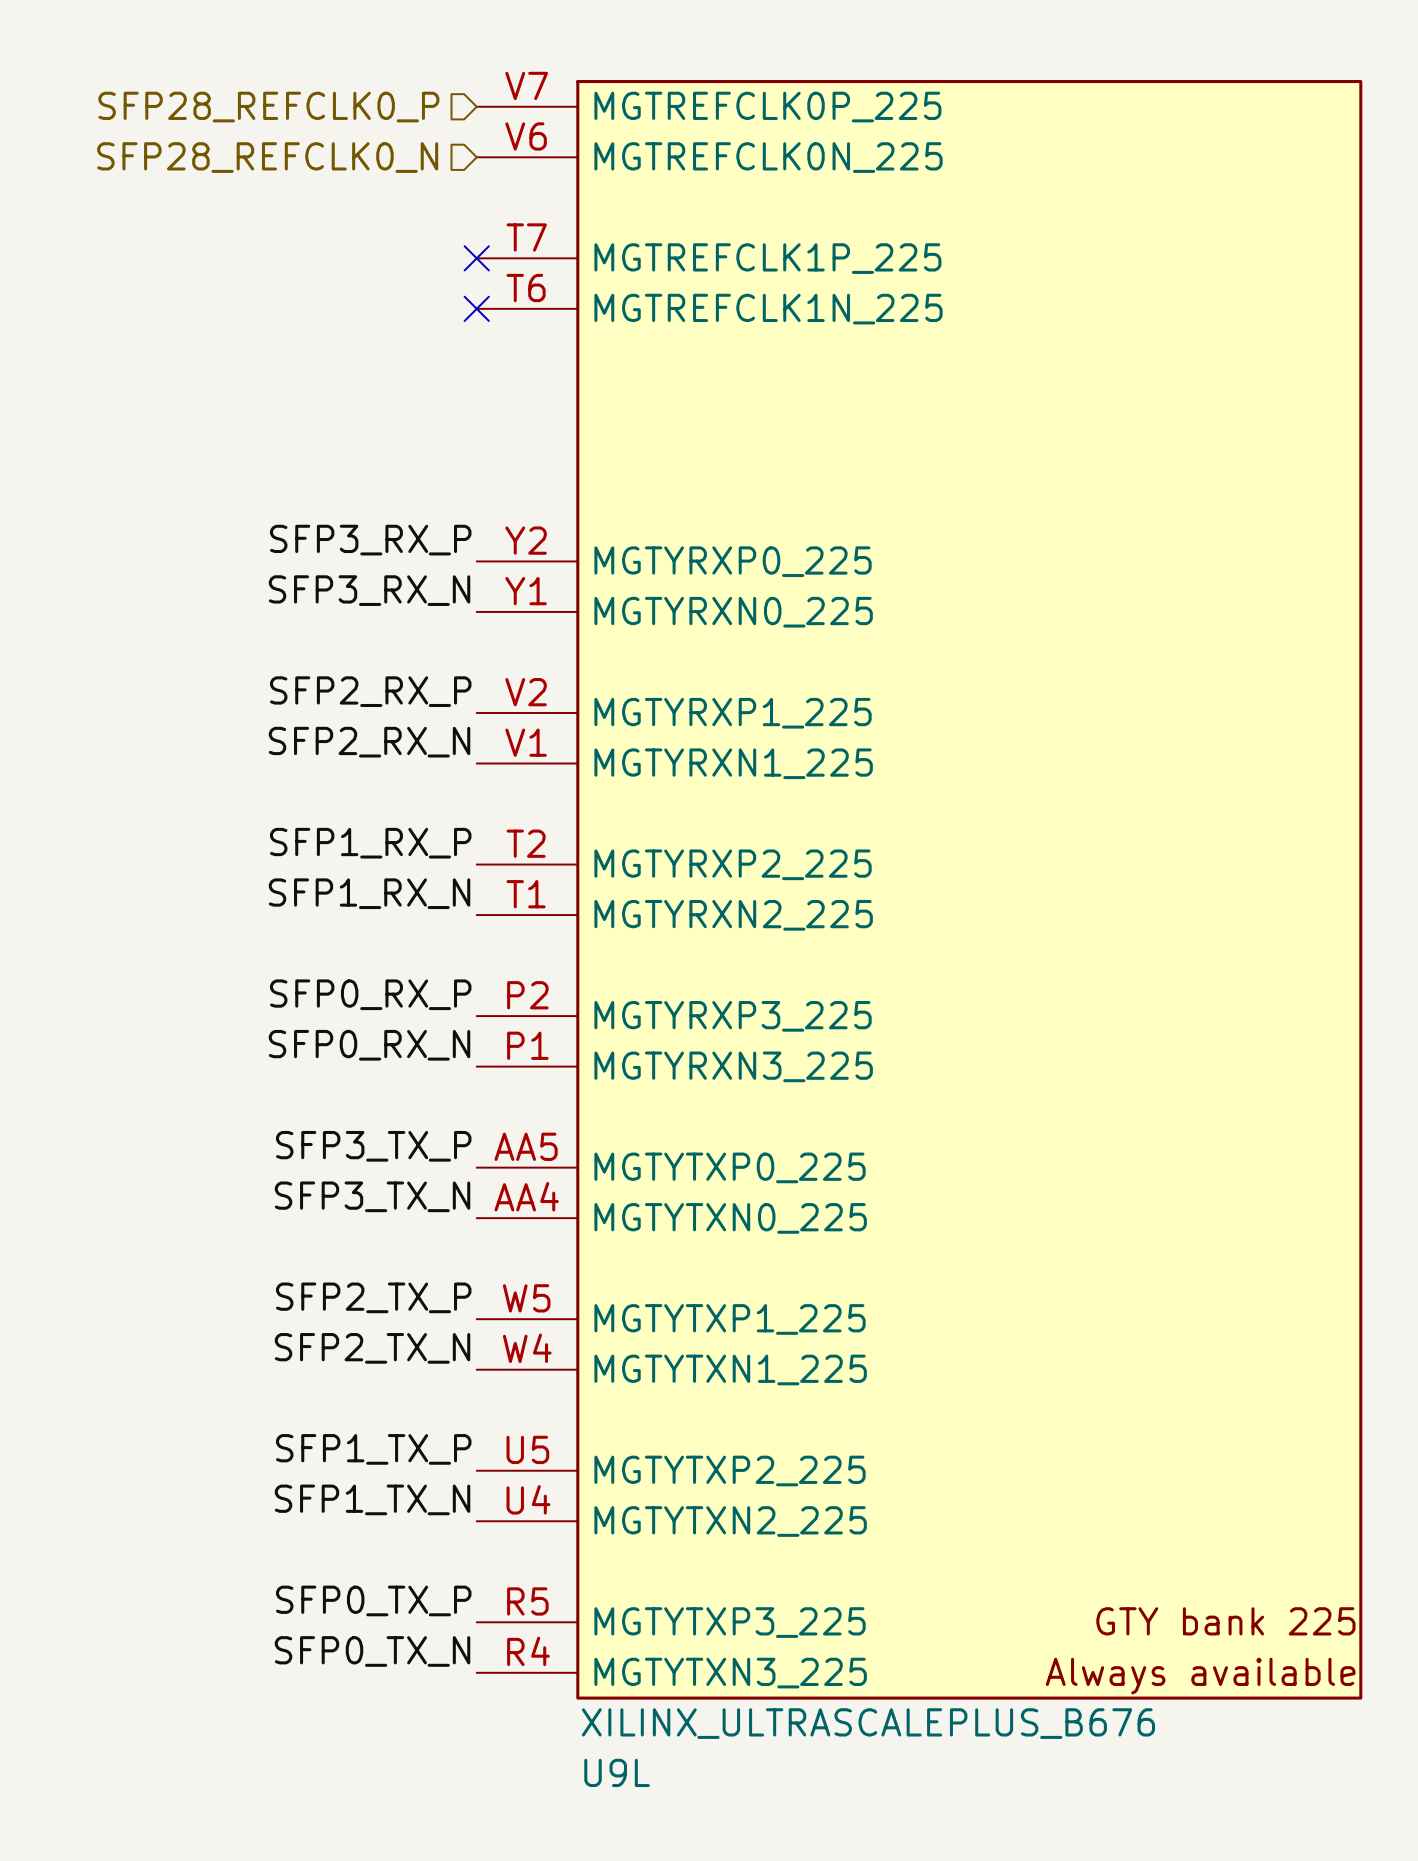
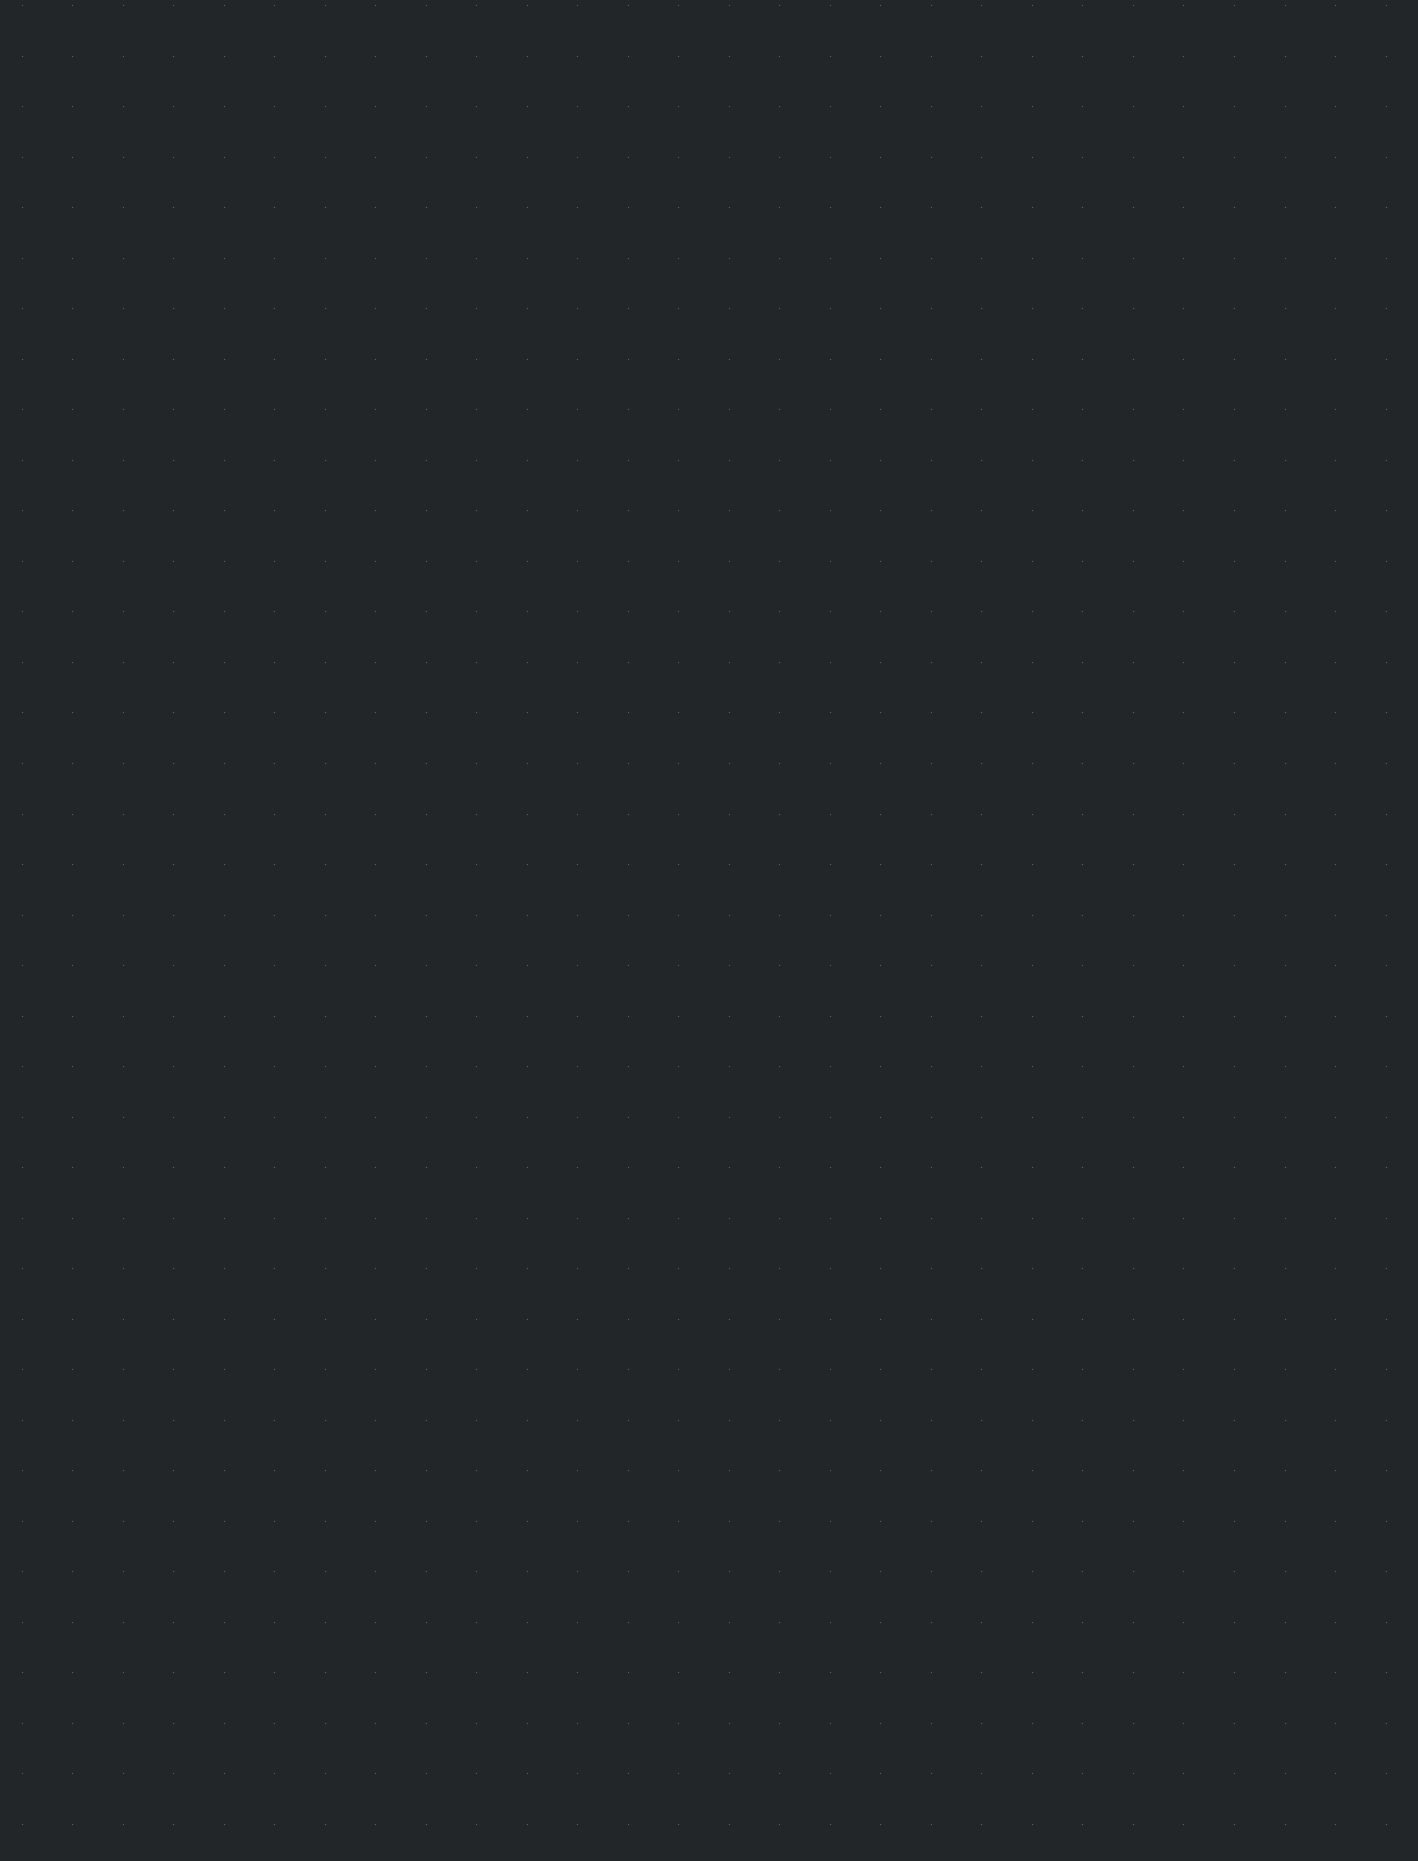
hierarchical label: SFP28_REFCLK0_P (268, 107) -> none
hierarchical label: SFP28_REFCLK0_N (267, 157) -> none
no-connect mark: (476, 258) -> none
no-connect mark: (476, 308) -> none
label: SFP3_RX_P (370, 540) -> none
label: SFP3_RX_N (369, 590) -> none
label: SFP2_RX_P (370, 691) -> none
label: SFP2_RX_N (369, 742) -> none
label: SFP1_RX_P (370, 843) -> none
U9L: XILINX_ULTRASCALEPLUS_B676 (919, 889) -> none
label: SFP1_RX_N (369, 893) -> none
label: SFP0_RX_P (370, 994) -> none
label: SFP0_RX_N (369, 1045) -> none
label: SFP3_TX_P (373, 1146) -> none
label: SFP3_TX_N (372, 1196) -> none
label: SFP2_TX_P (373, 1297) -> none
label: SFP2_TX_N (372, 1348) -> none
label: SFP1_TX_P (373, 1449) -> none
label: SFP1_TX_N (372, 1499) -> none
label: SFP0_TX_P (373, 1600) -> none
label: SFP0_TX_N (372, 1651) -> none

